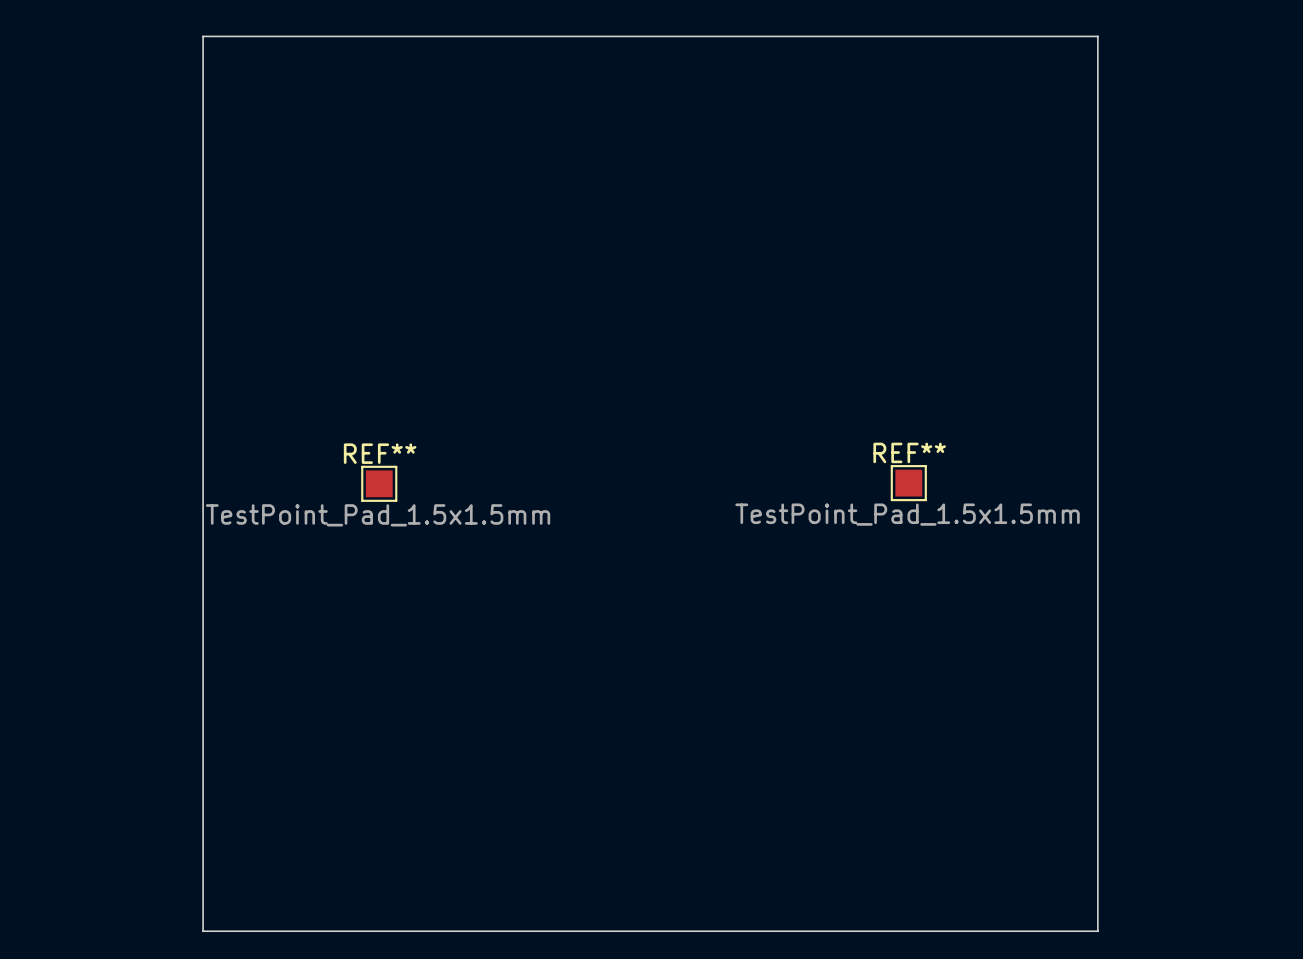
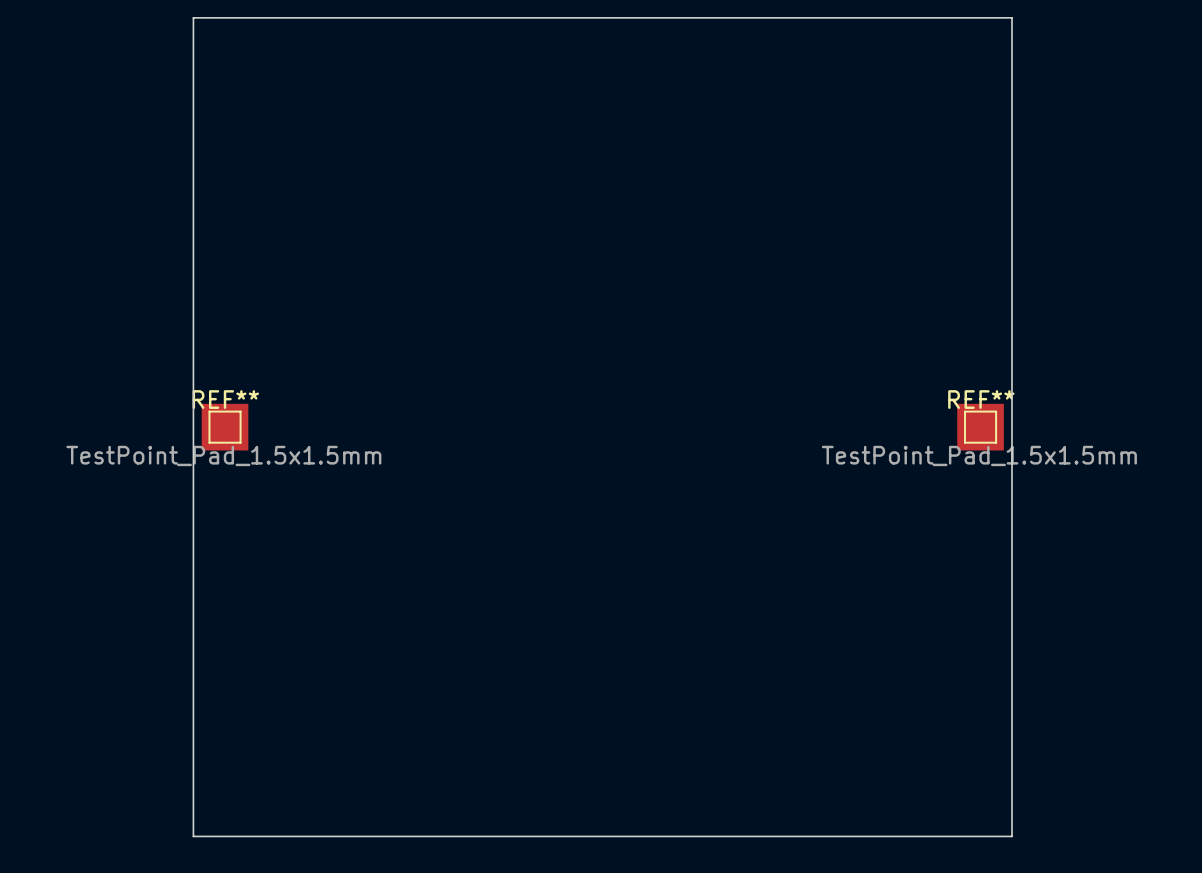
REF**: none -> TestPoint_Pad_1.5x1.5mm (225, 427)
REF**: TestPoint_Pad_1.5x1.5mm (379, 483) -> none
REF**: TestPoint_Pad_1.5x1.5mm (908, 483) -> none
REF**: none -> TestPoint_Pad_1.5x1.5mm (980, 427)

